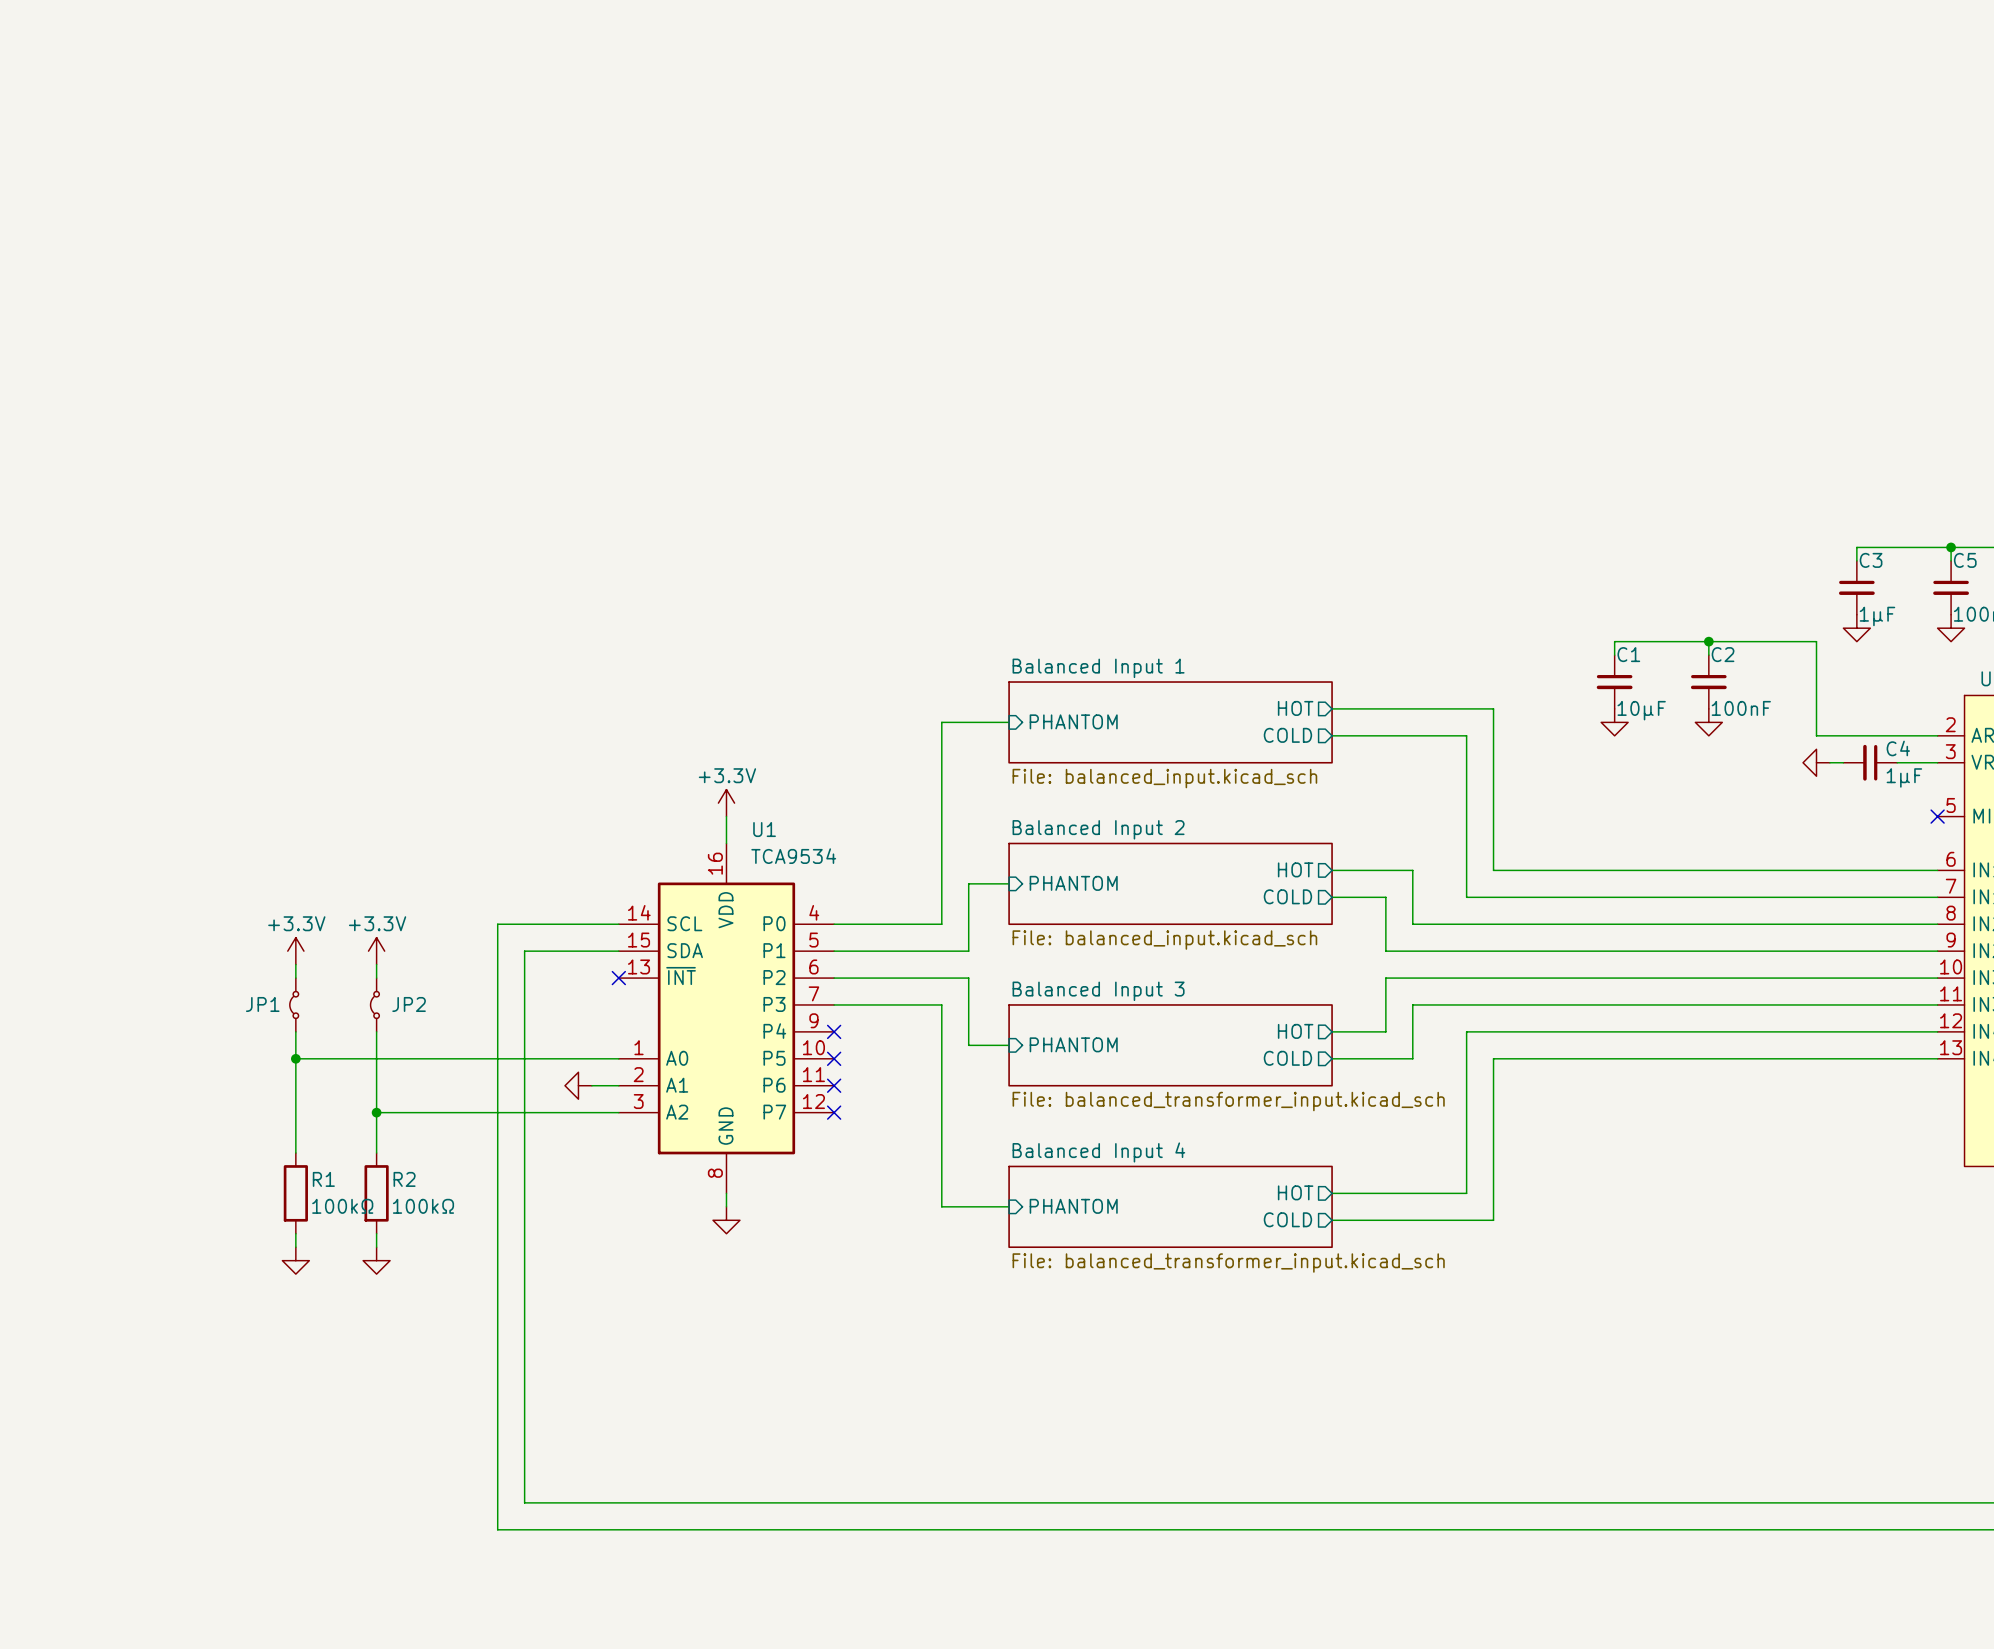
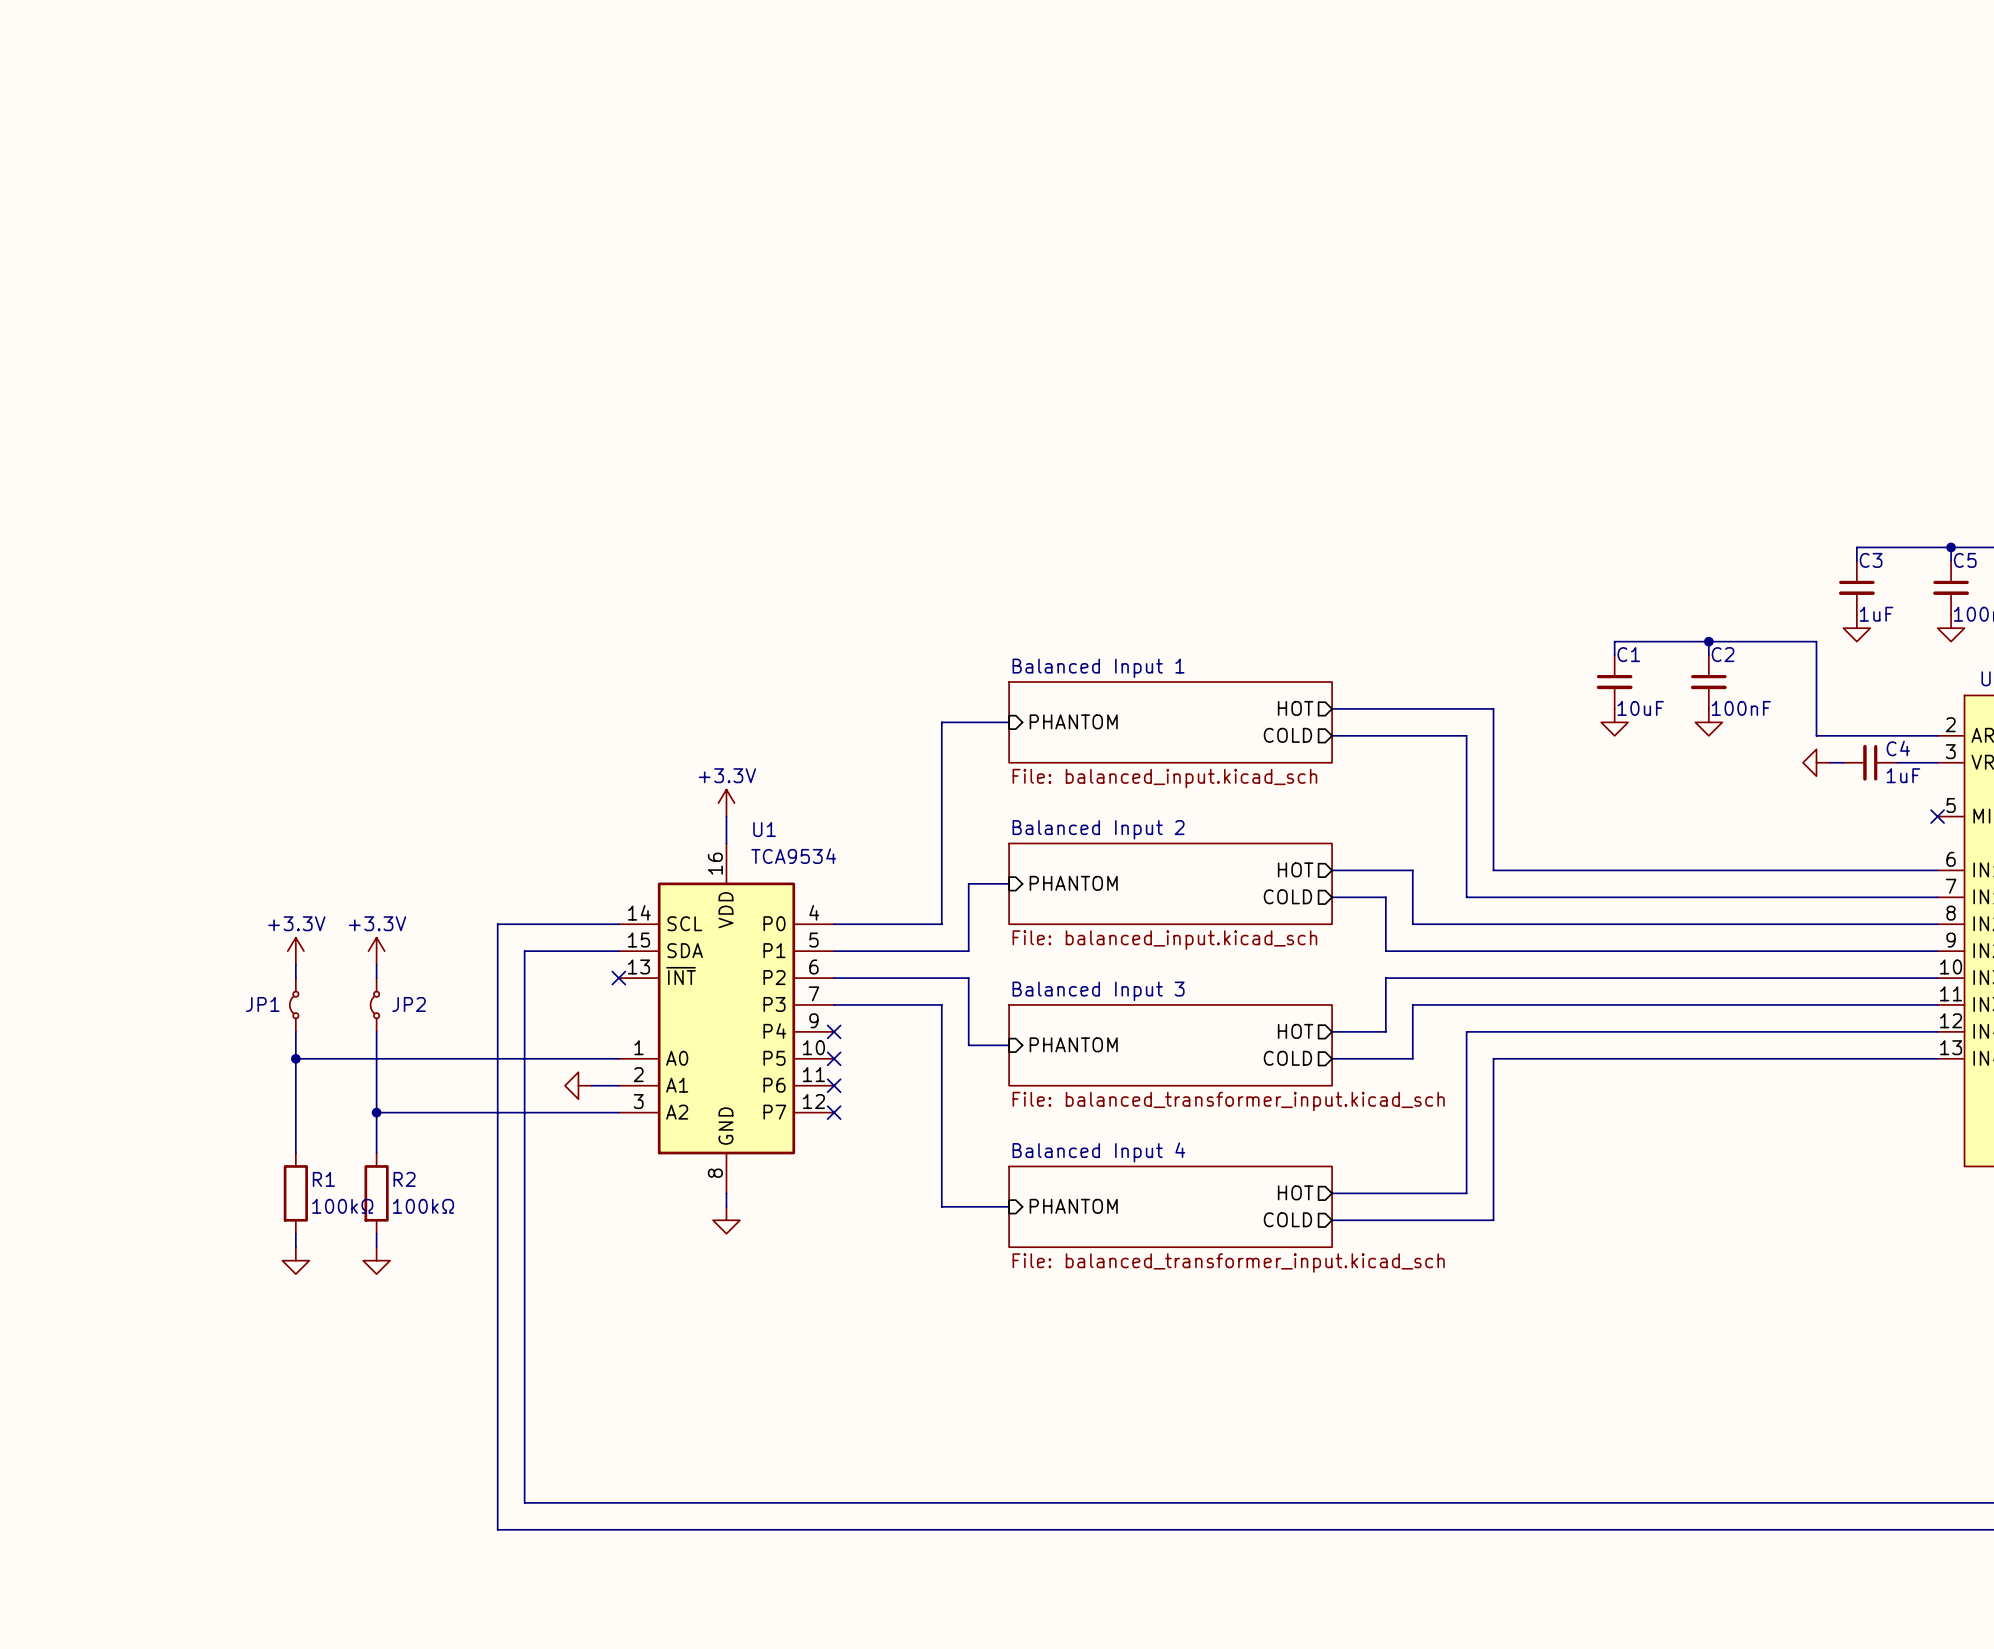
C3 value: 1μF (1877, 616) -> 1uF (1876, 614)
C1 value: 10μF (1641, 710) -> 10uF (1640, 708)
C4 value: 1μF (1904, 777) -> 1uF (1903, 775)

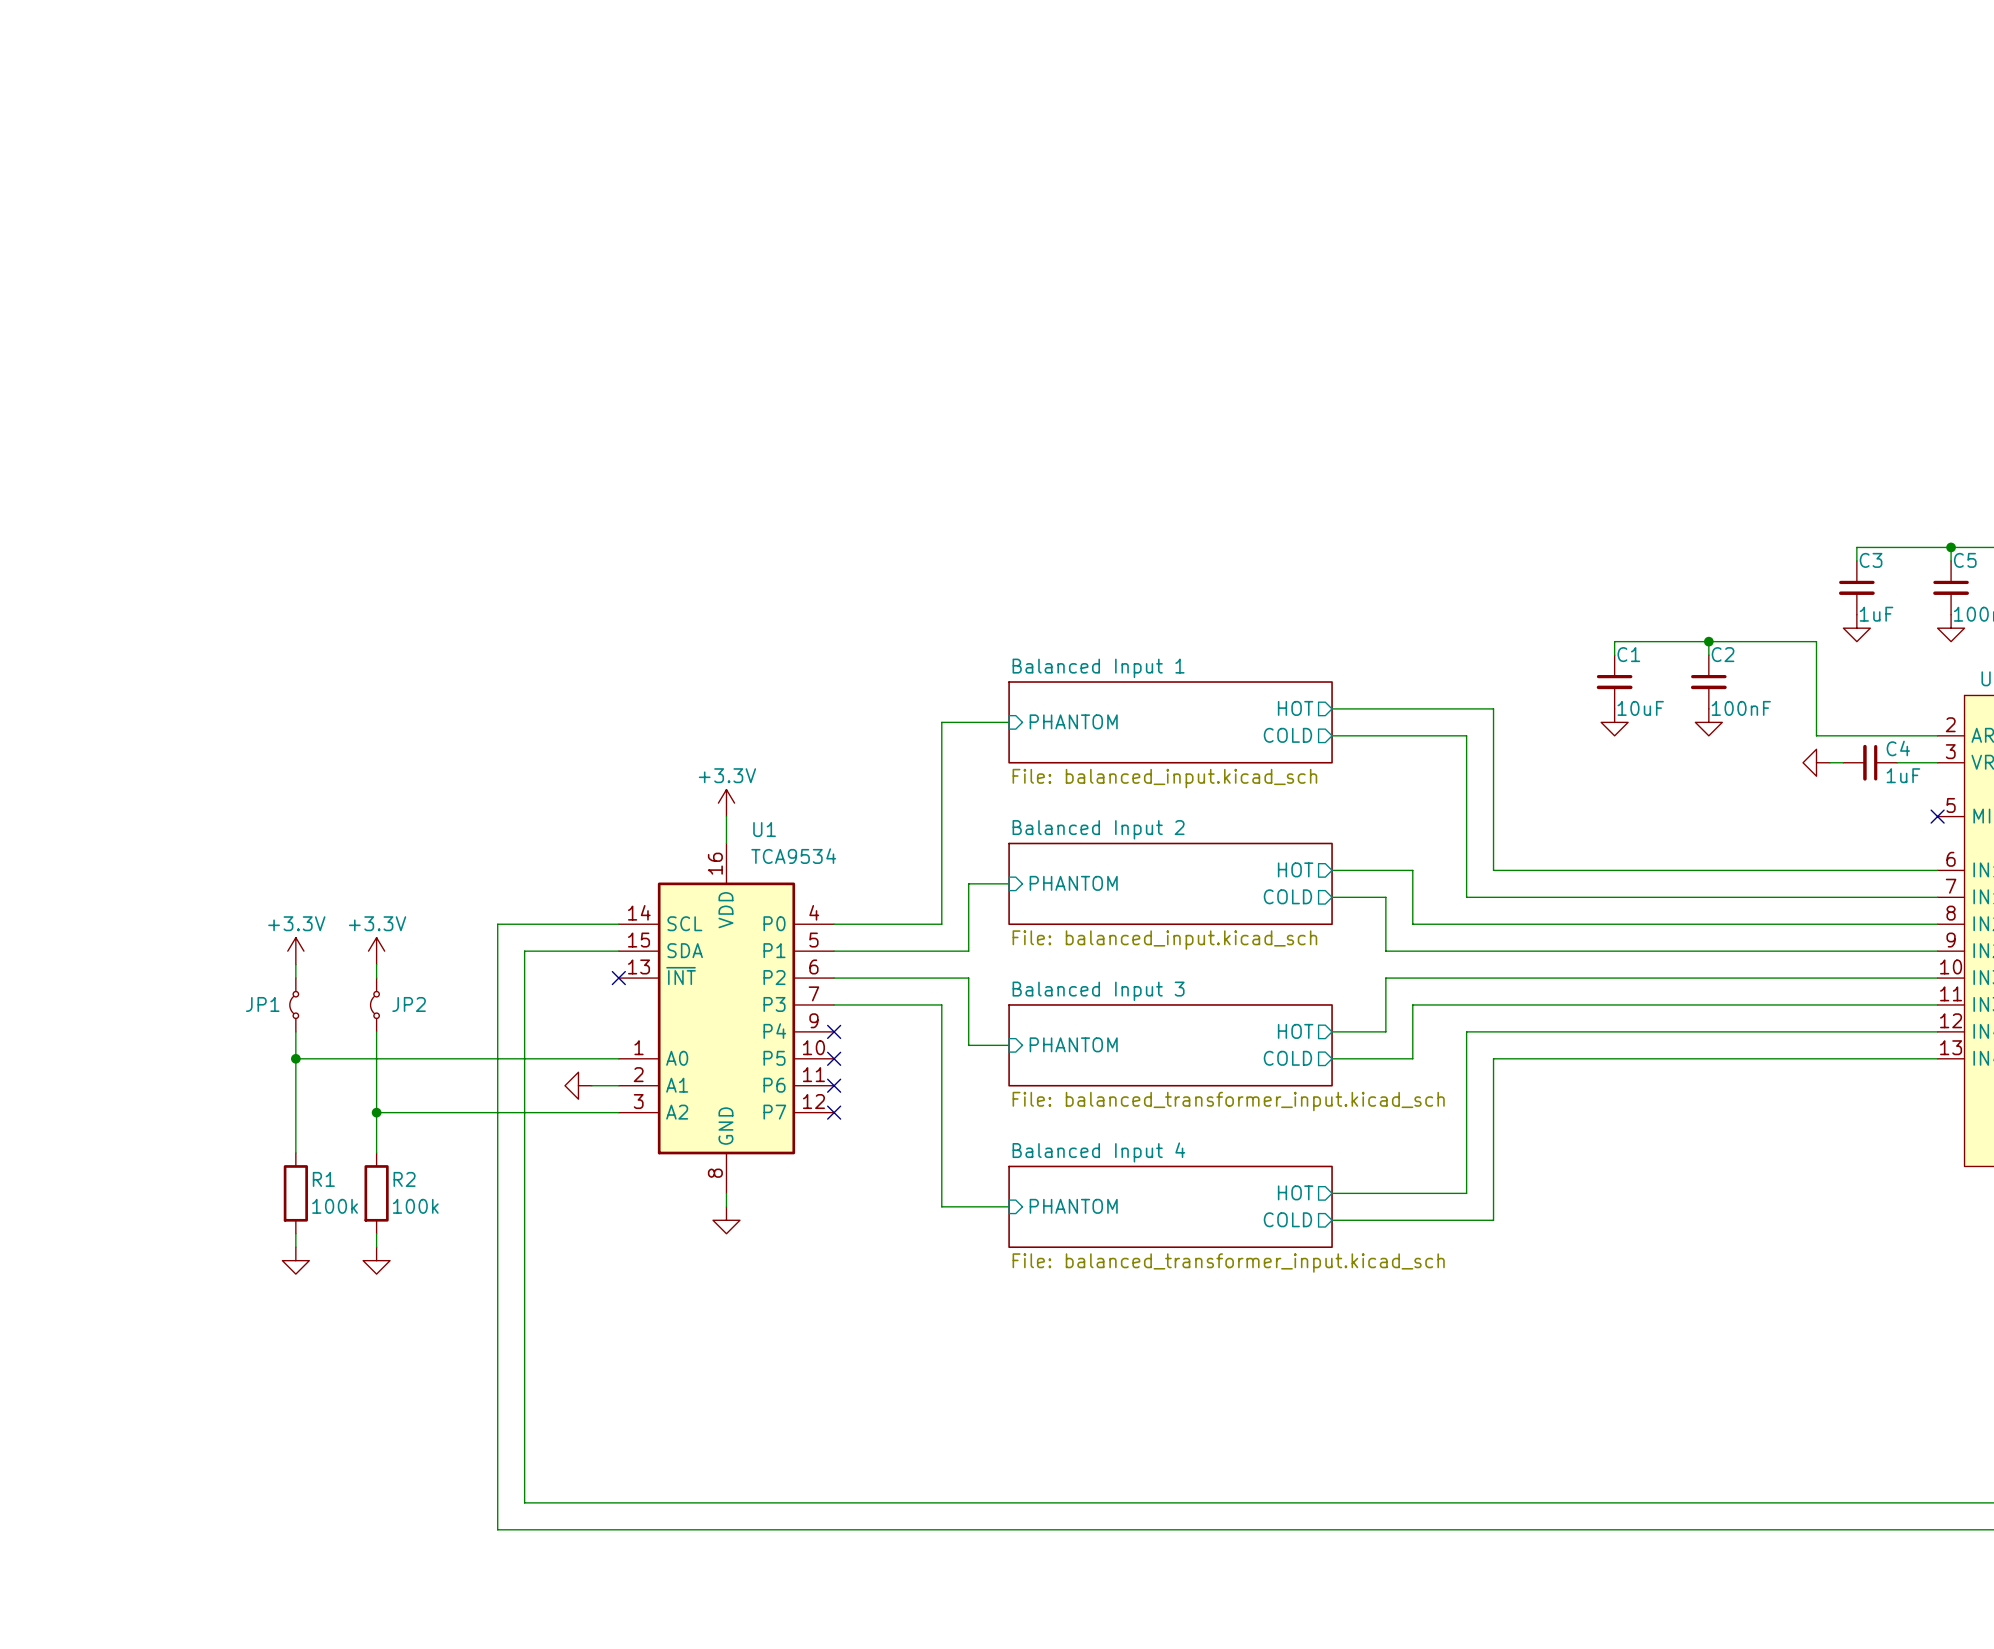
R1 value: 100kΩ (342, 1206) -> 100k (335, 1206)
R2 value: 100kΩ (423, 1206) -> 100k (415, 1206)

